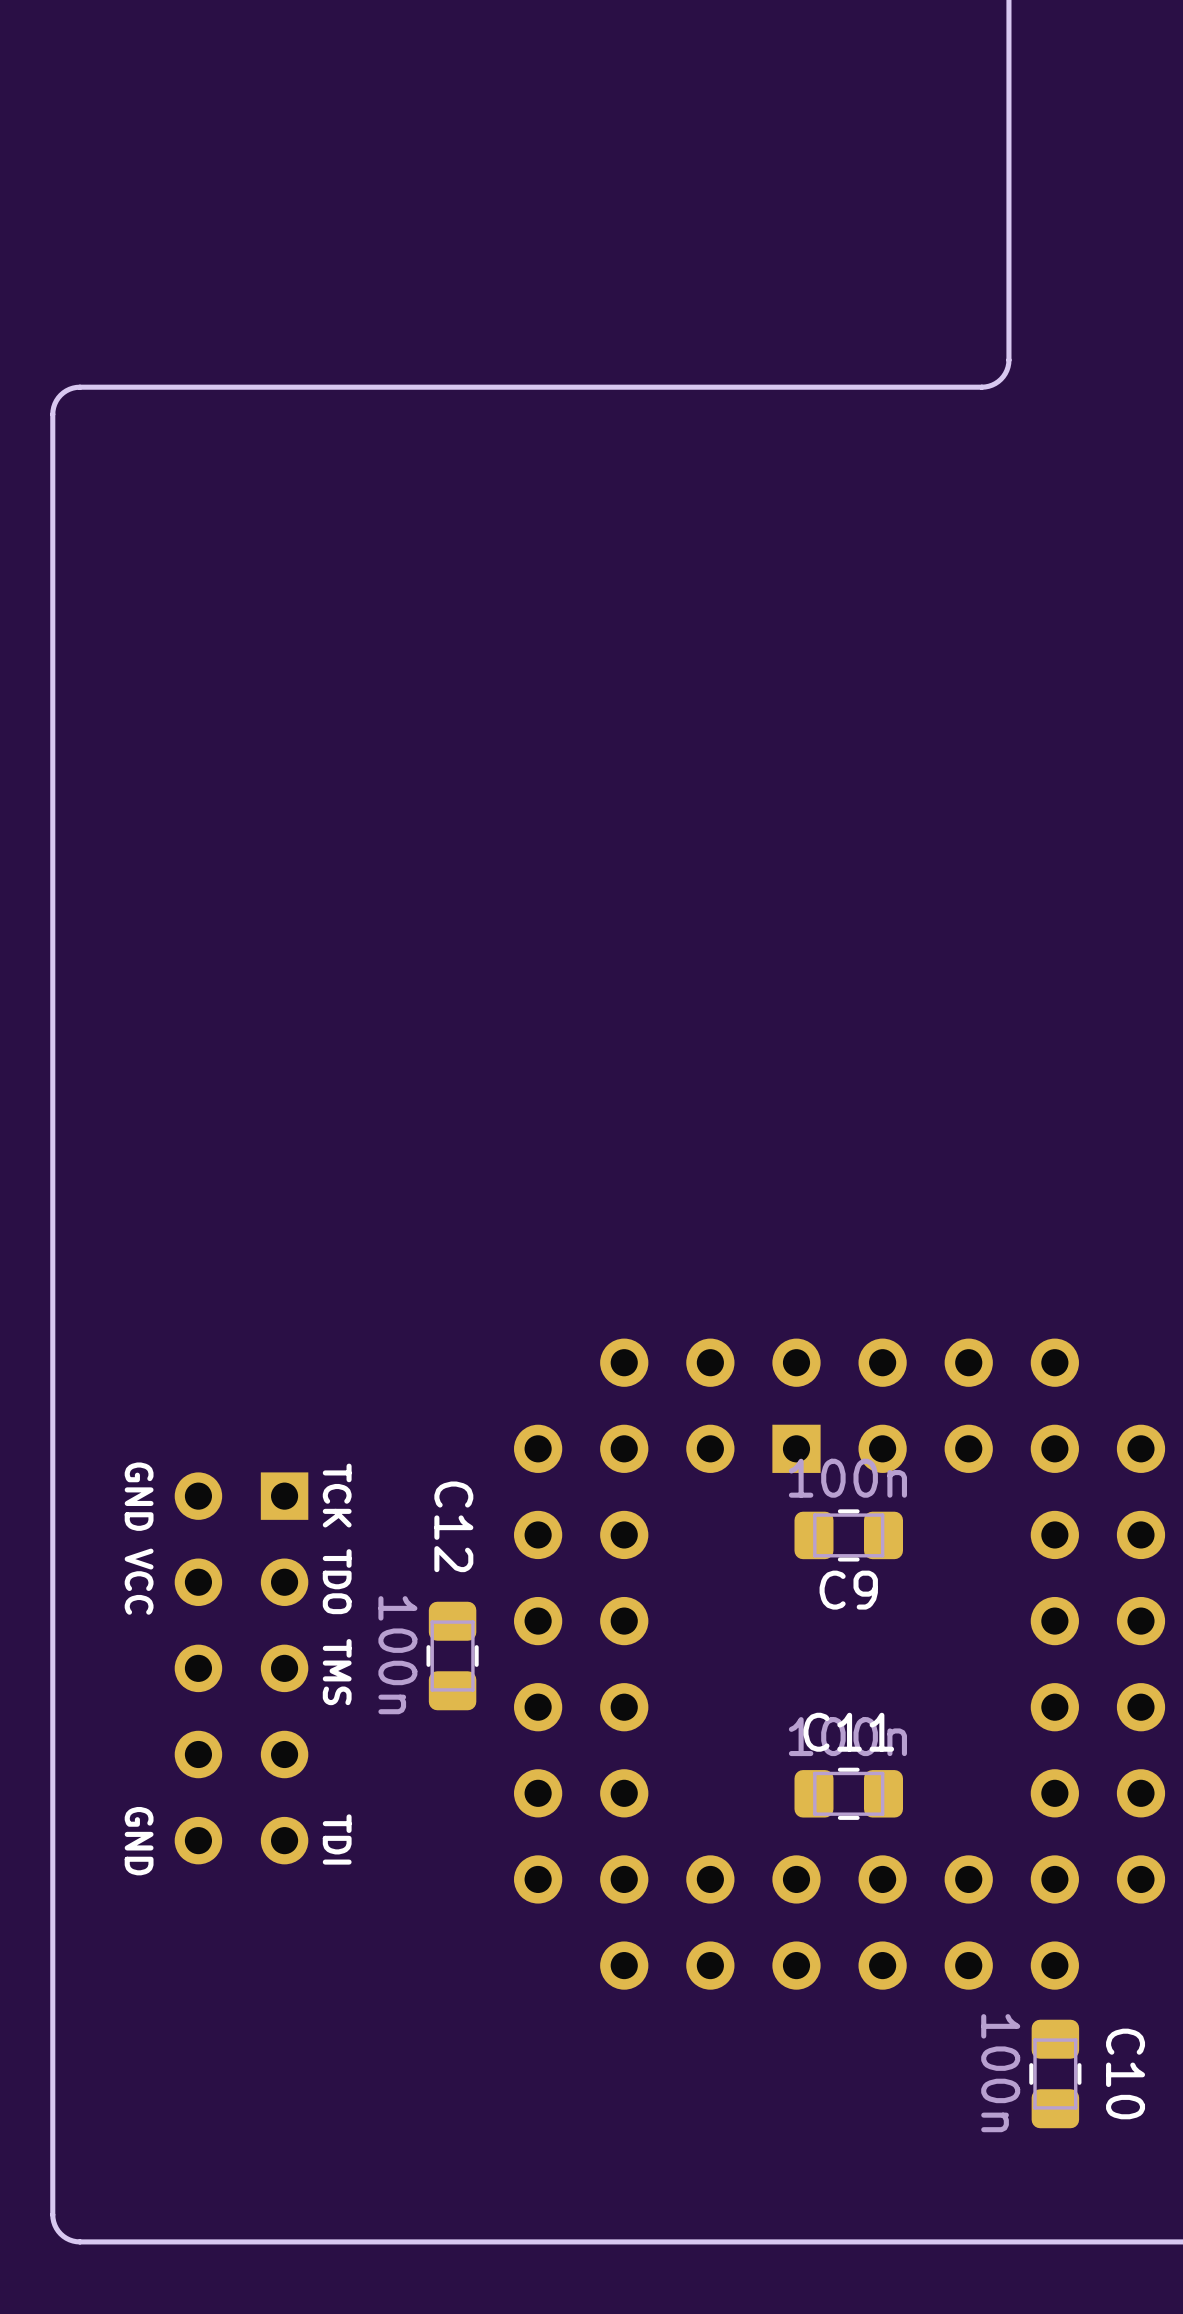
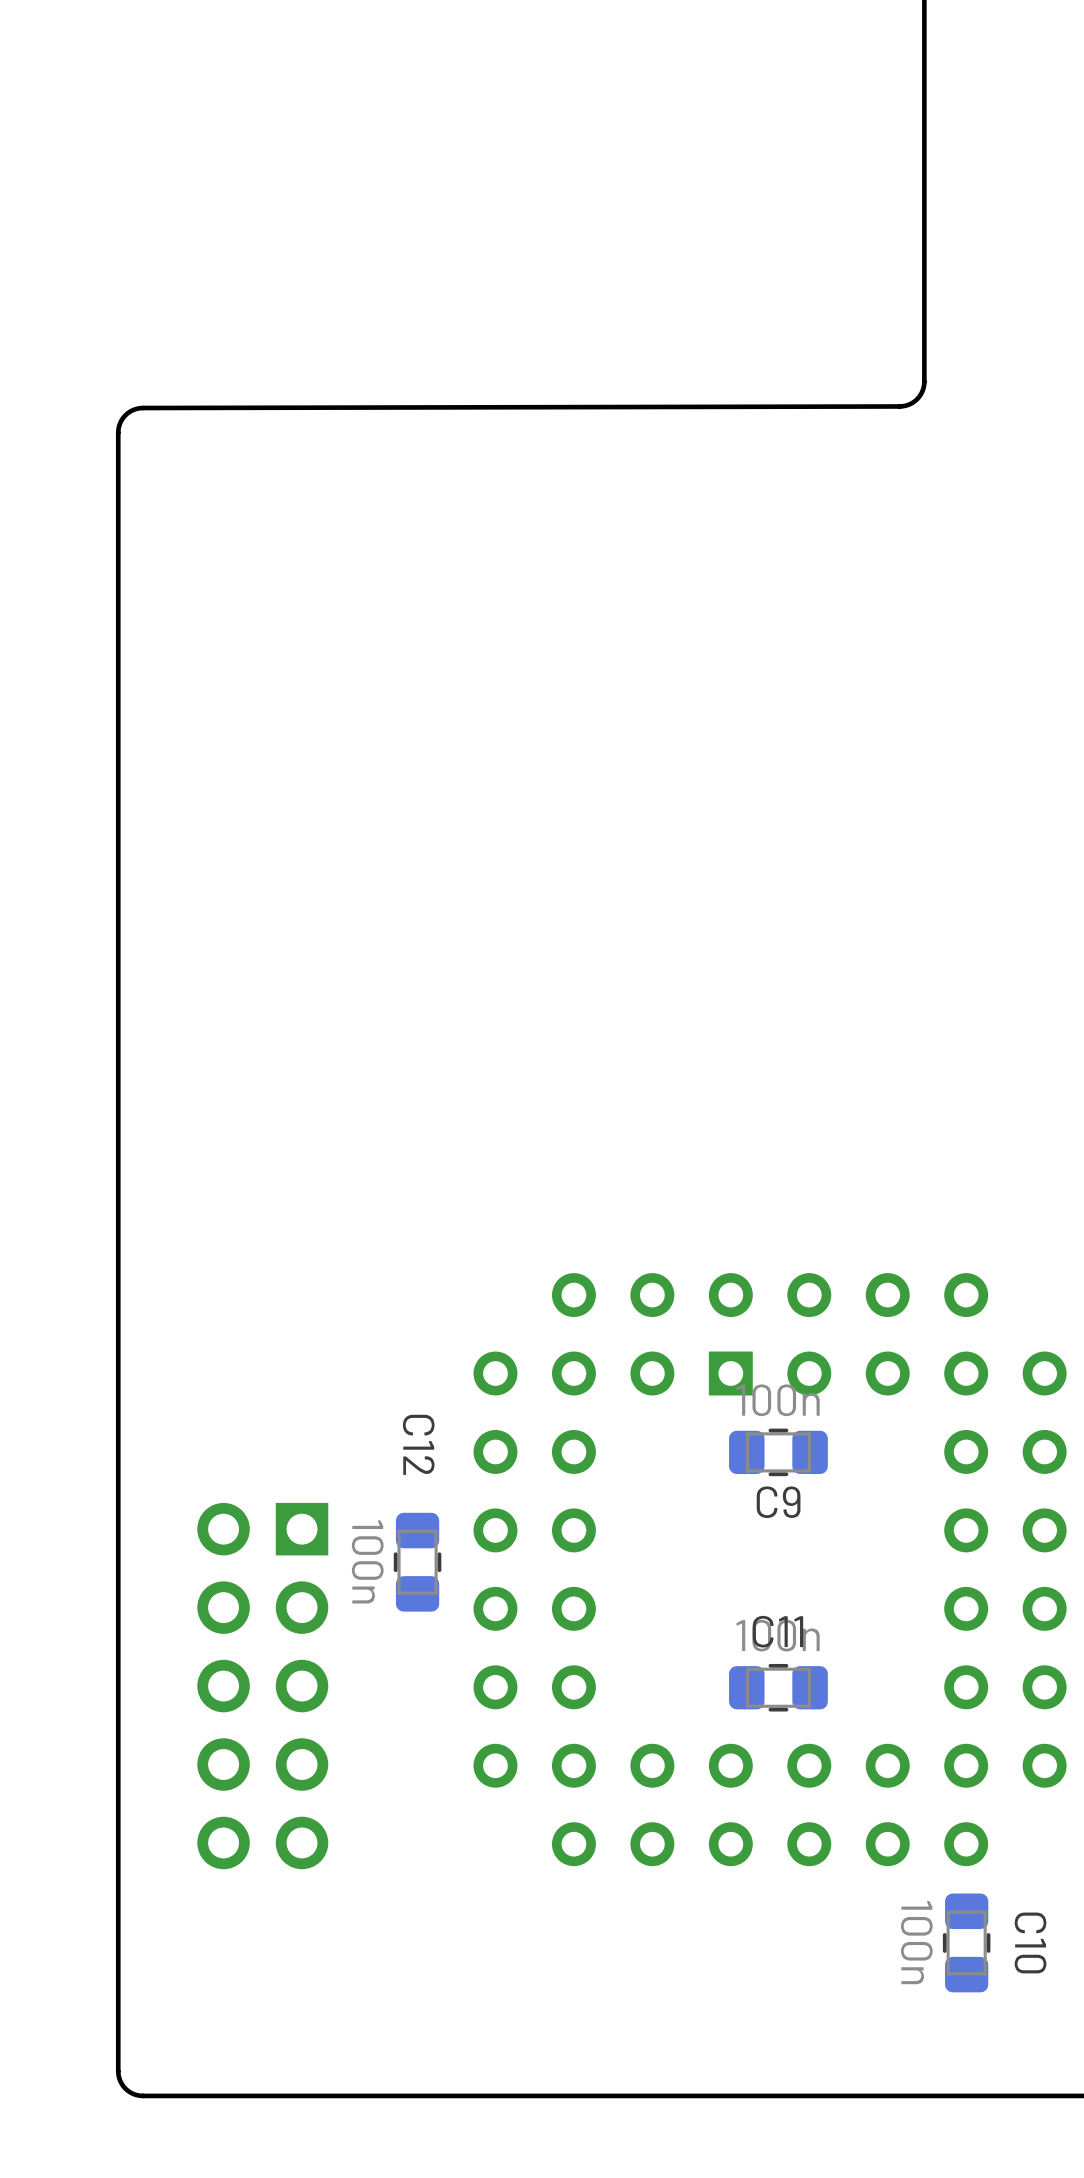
board edge: (981, 387) (79, 387) (63, 392) (54, 403) (52, 414) (52, 2214) (58, 2231) (72, 2240) (151, 2241) -> (899, 406) (142, 408) (127, 413) (120, 423) (118, 432) (118, 2071) (120, 2080) (125, 2088) (133, 2094) (142, 2095)
text: TCK (337, 1495) -> none
text: GND (139, 1496) -> none
text: VCC (139, 1581) -> none
text: TDO (337, 1581) -> none
part: (241, 1668) -> none
text: TMS (337, 1672) -> none
part: none -> (262, 1686)
text: TDI (337, 1839) -> none
text: GND (139, 1841) -> none

